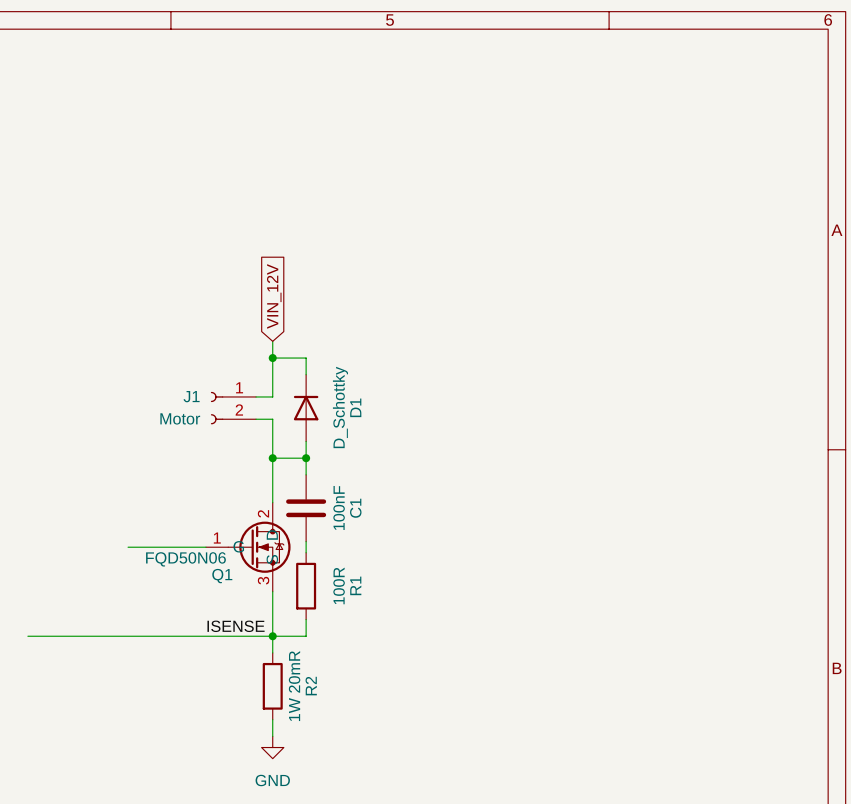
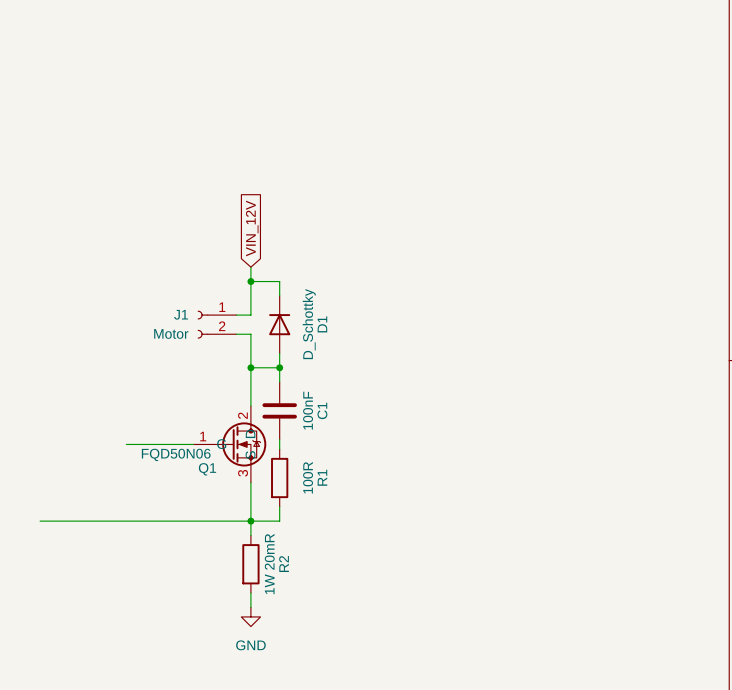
label: ISENSE (236, 626) -> none

